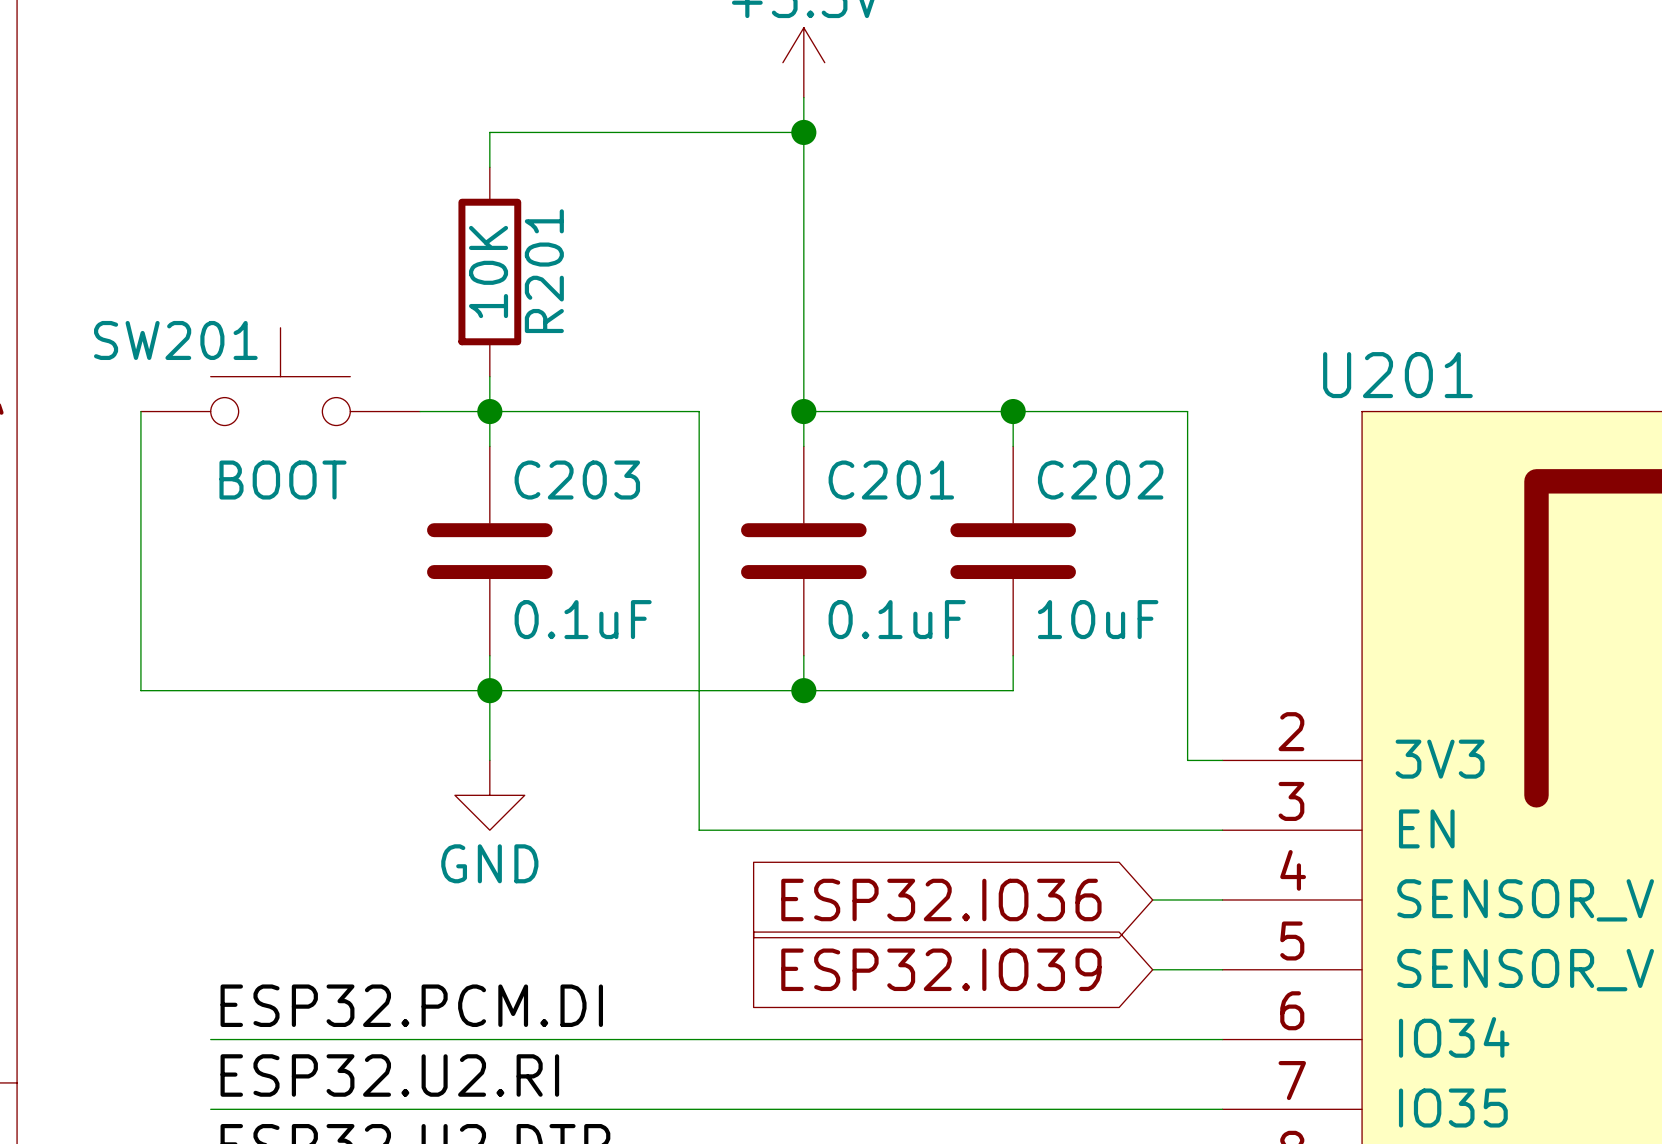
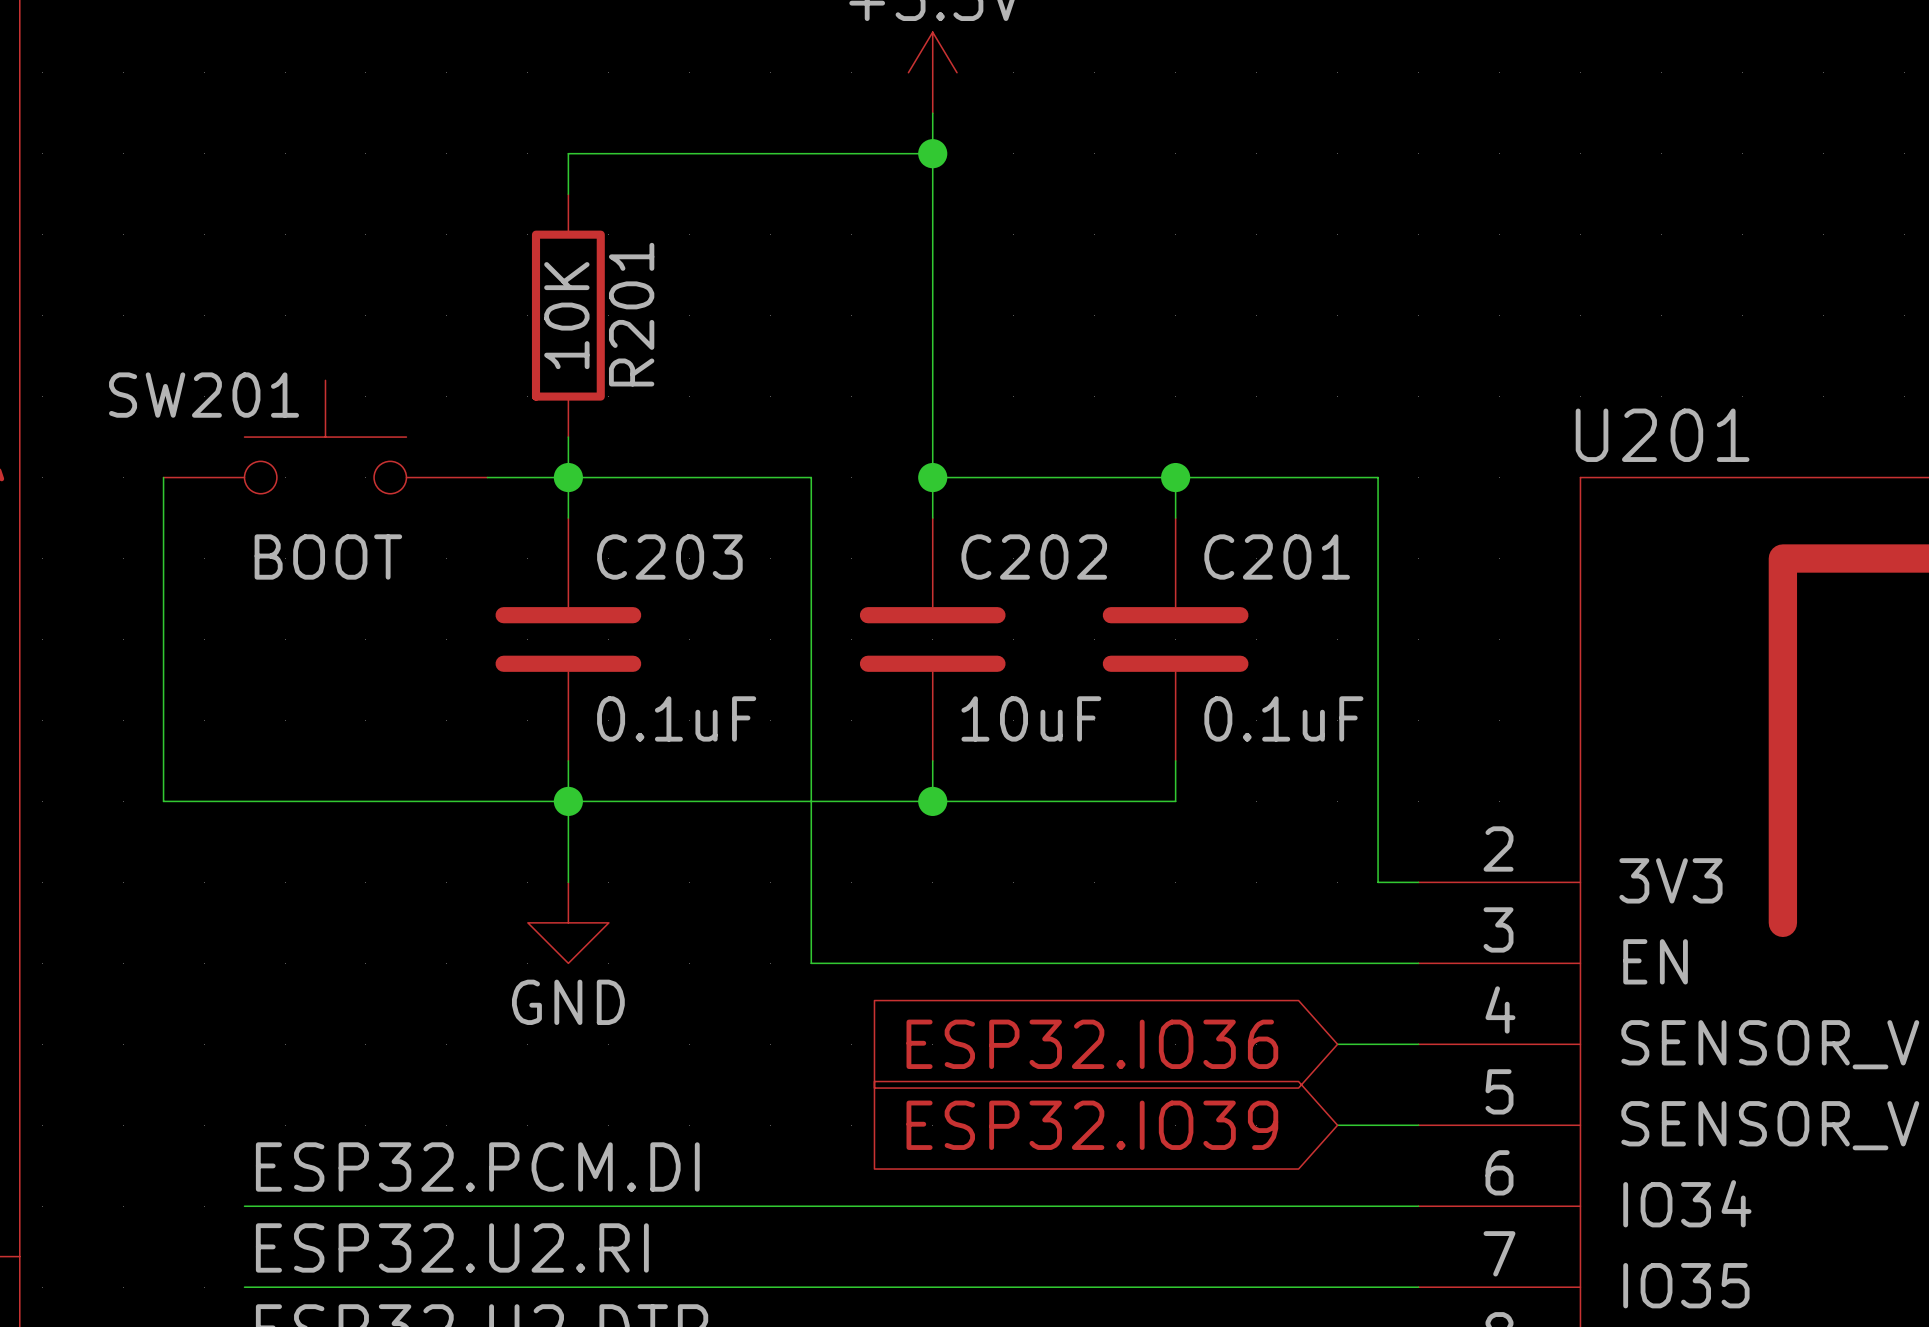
U201 name position: U201 (1397, 375) -> U201 (1662, 435)
C201 name: C201 (891, 480) -> C202 (1034, 557)
C202 name: C202 (1100, 480) -> C201 (1277, 557)
C201 value: 0.1uF (897, 619) -> 10uF (1031, 718)
C202 value: 10uF (1098, 619) -> 0.1uF (1283, 718)

